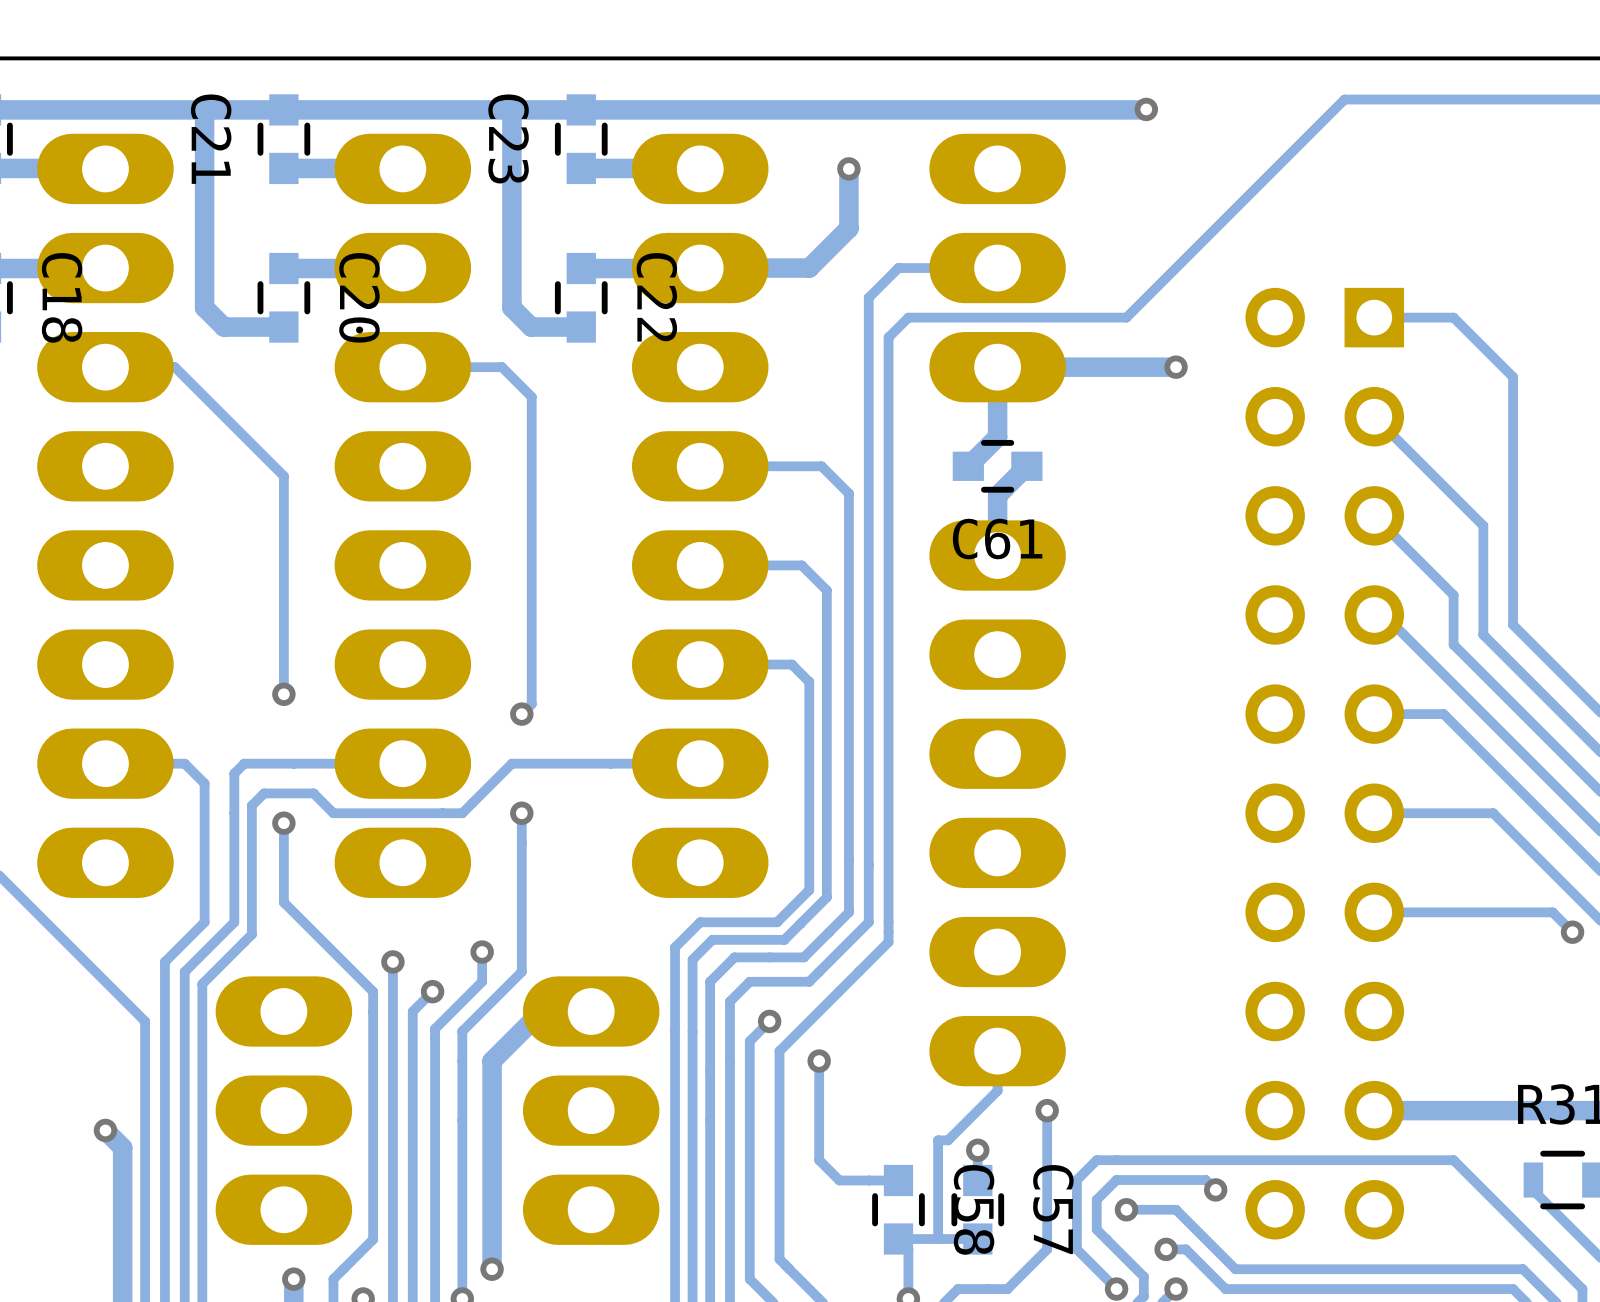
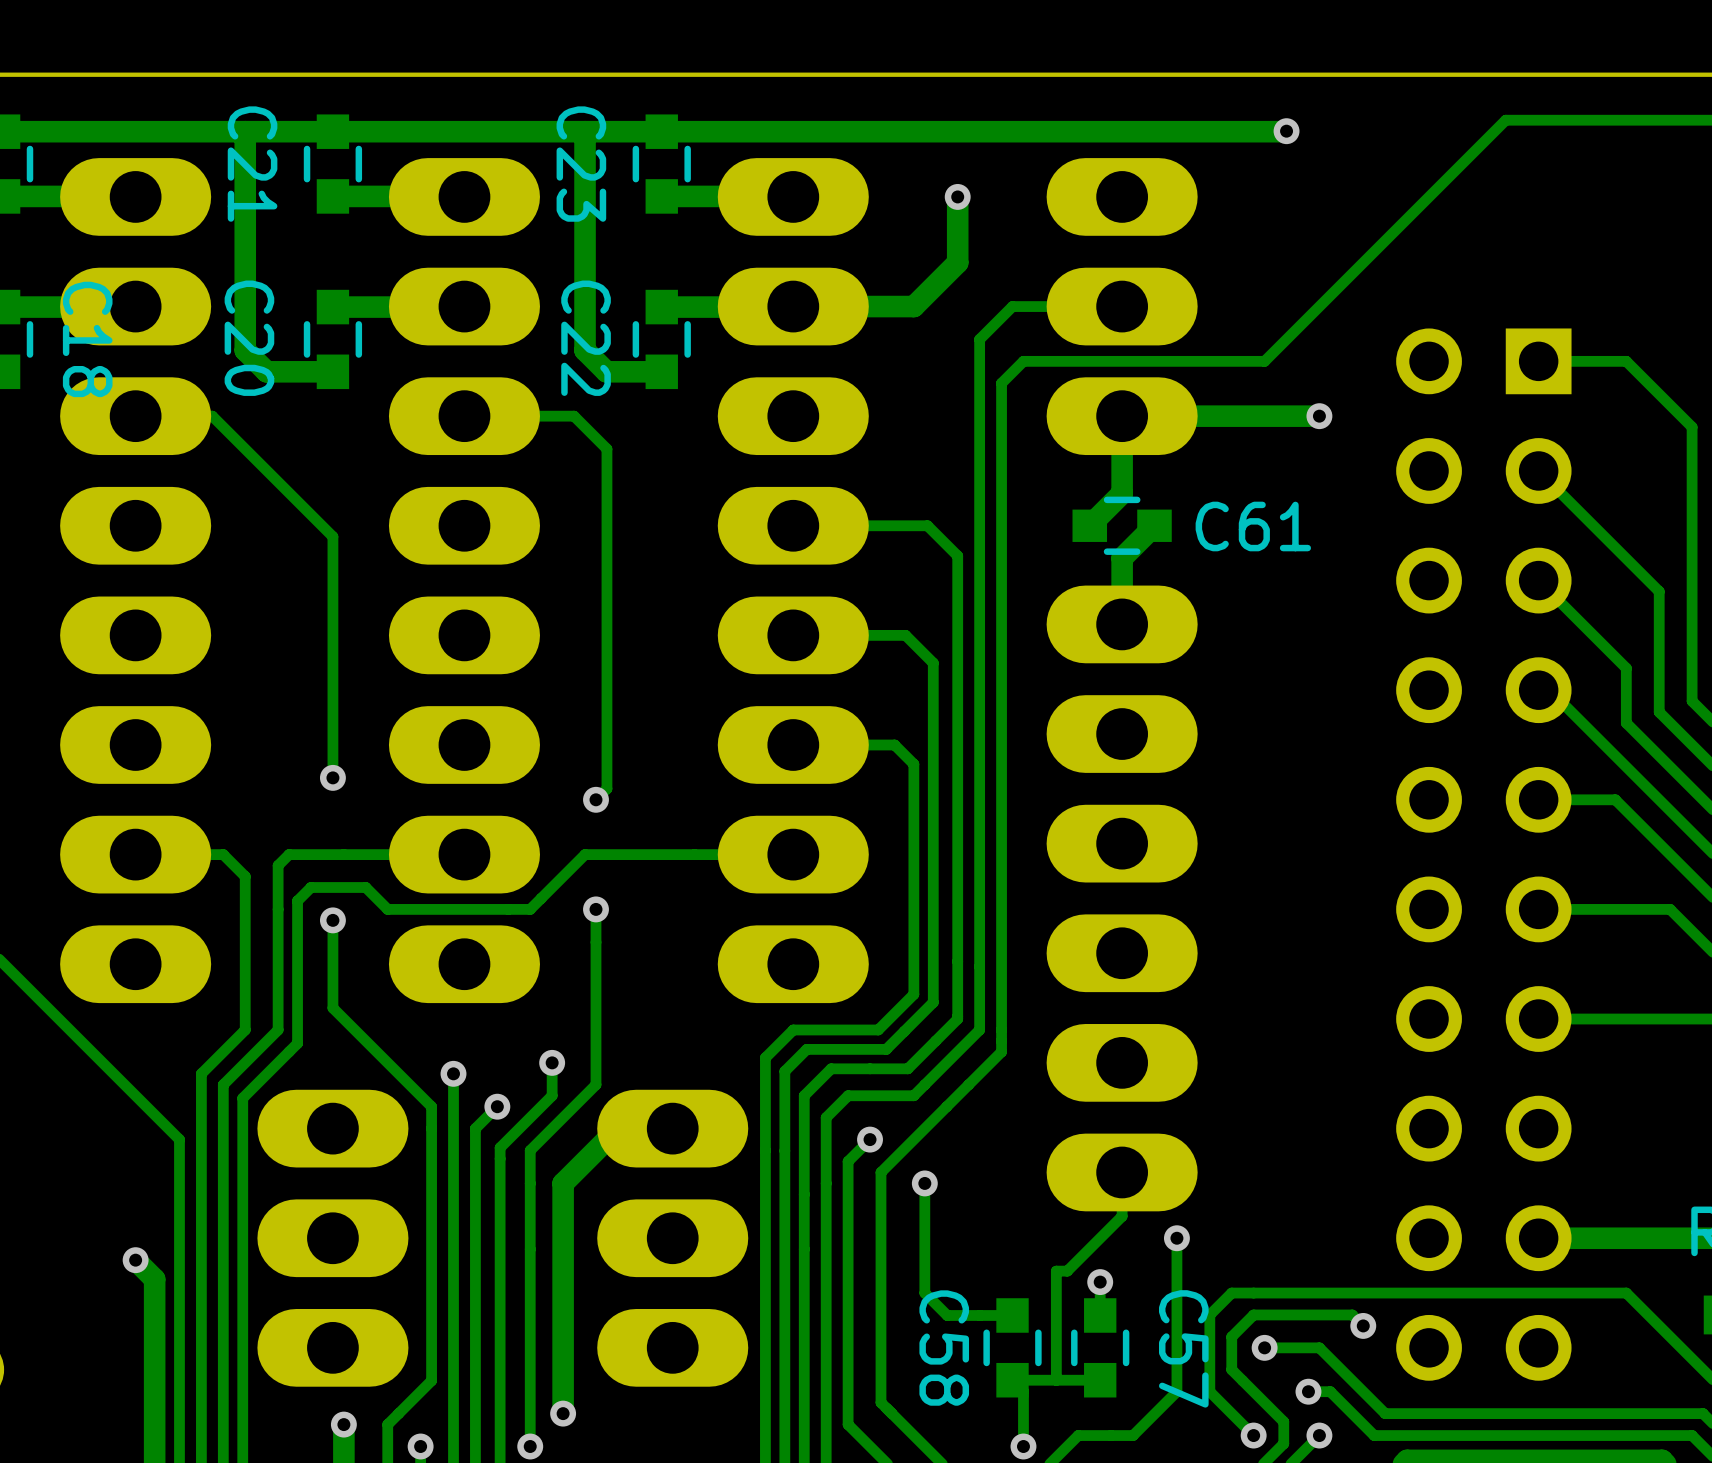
C20 name position: C20 (359, 297) -> C20 (249, 338)
C22 name position: C22 (656, 297) -> C22 (586, 338)
C61 name position: C61 (997, 539) -> C61 (1253, 526)
C58 name position: C58 (974, 1209) -> C58 (944, 1348)

